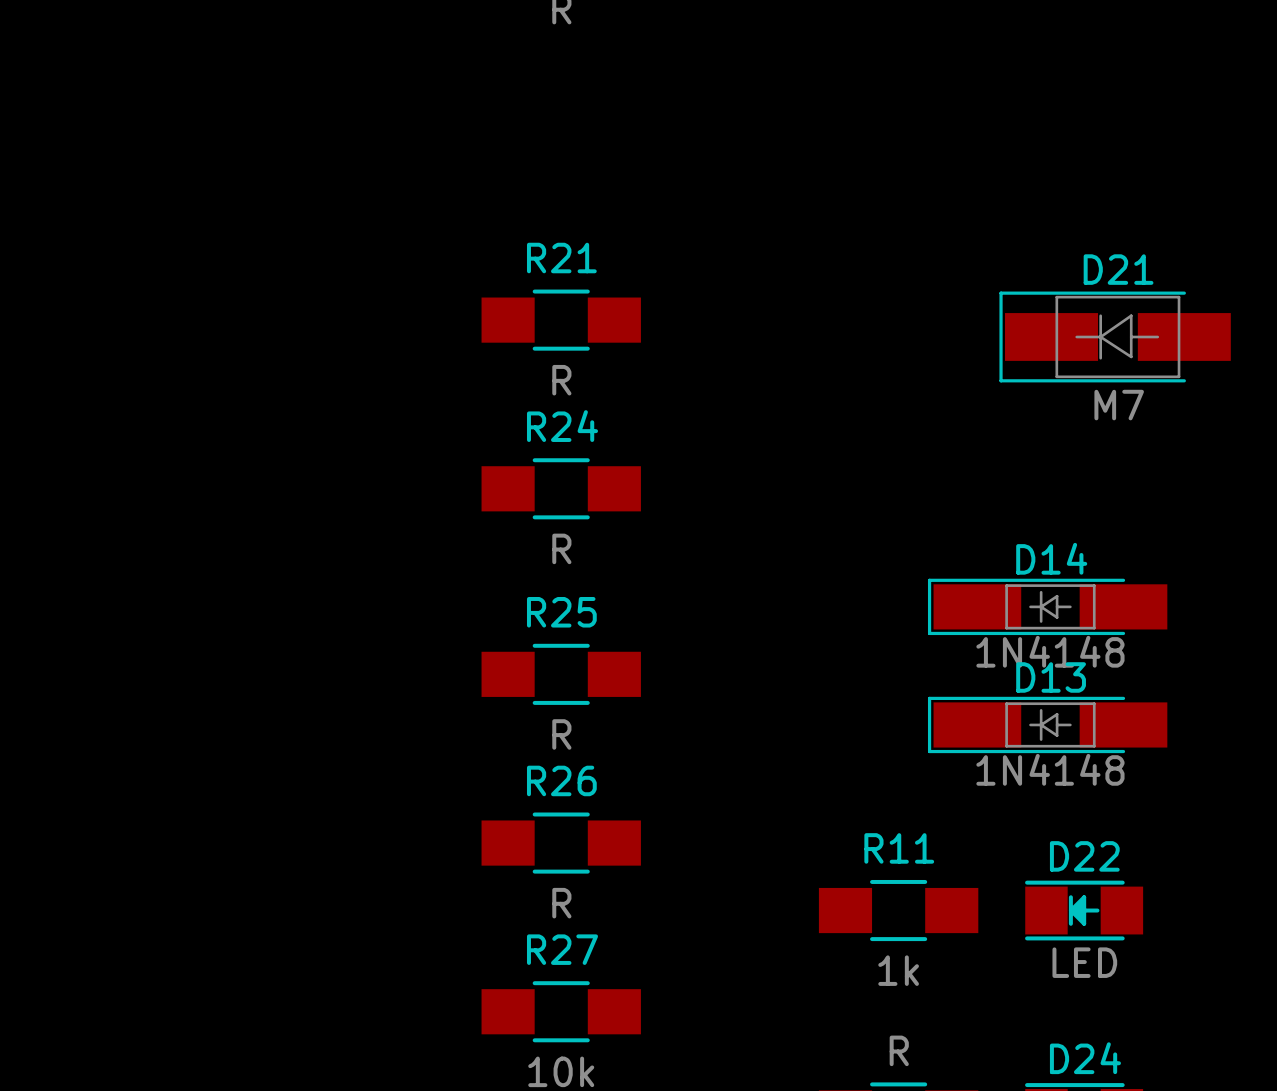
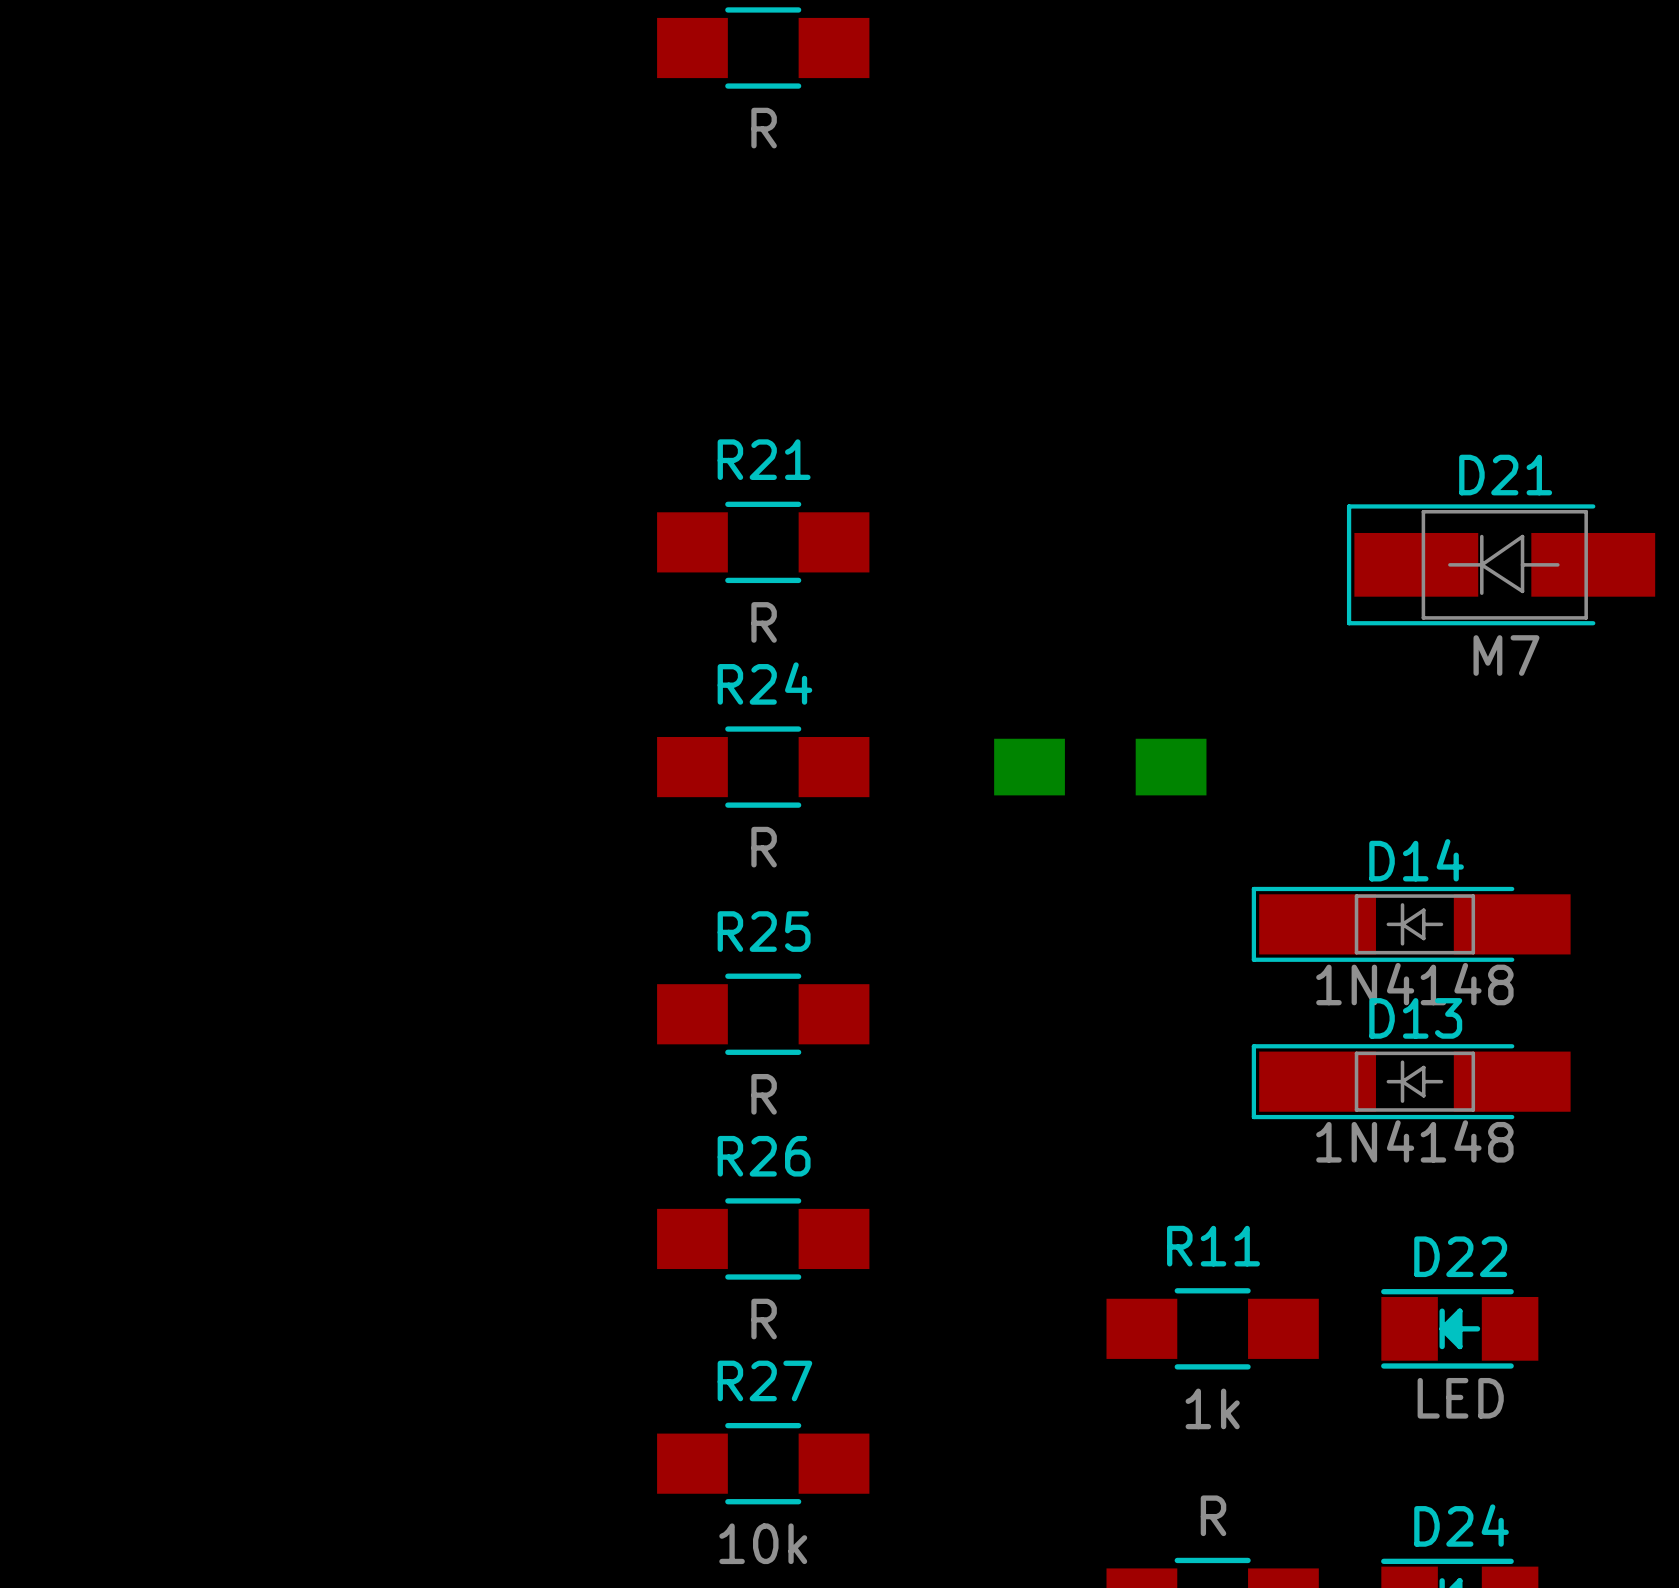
part: none -> (1100, 767)

